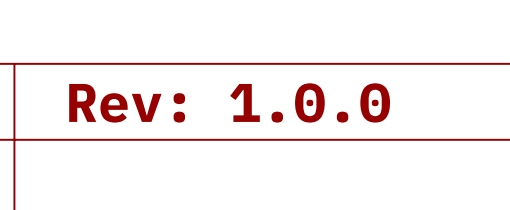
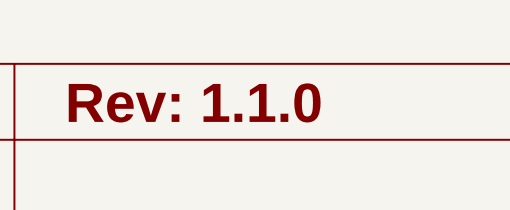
title block: Rev: 1.0.0 (229, 102) -> Rev: 1.1.0 (194, 102)

